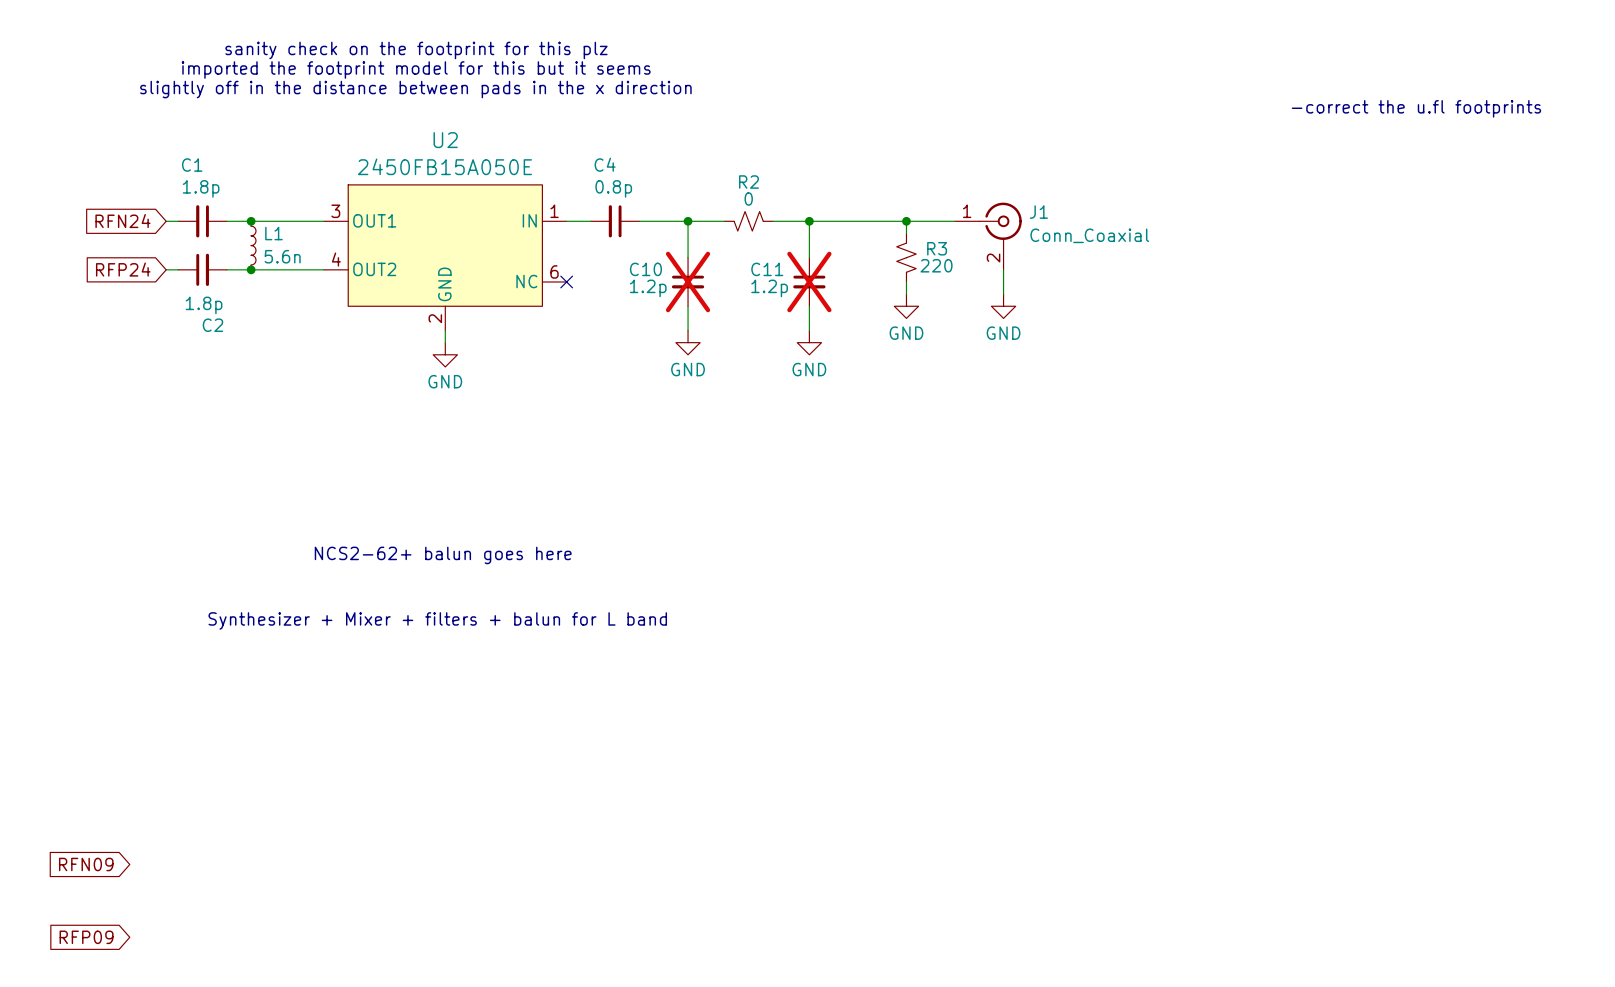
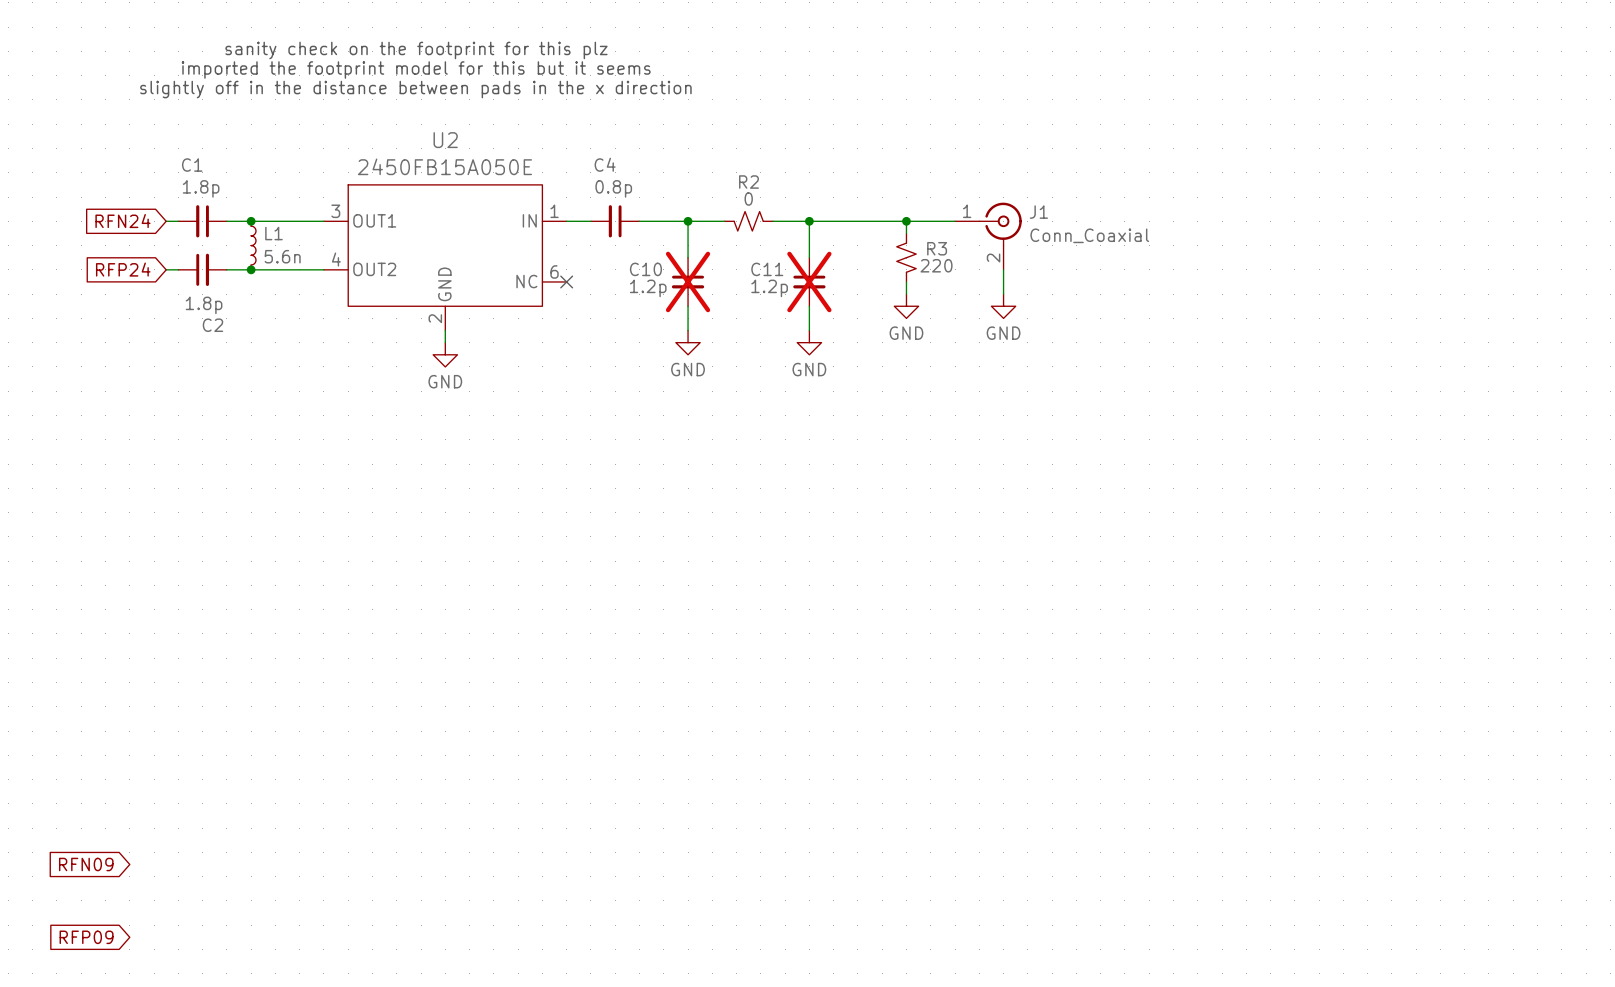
text: -correct the u.fl footprints (1416, 108) -> none
text: NCS2-62+ balun goes here (443, 555) -> none
text: Synthesizer + Mixer + filters + balun for L band (437, 620) -> none

